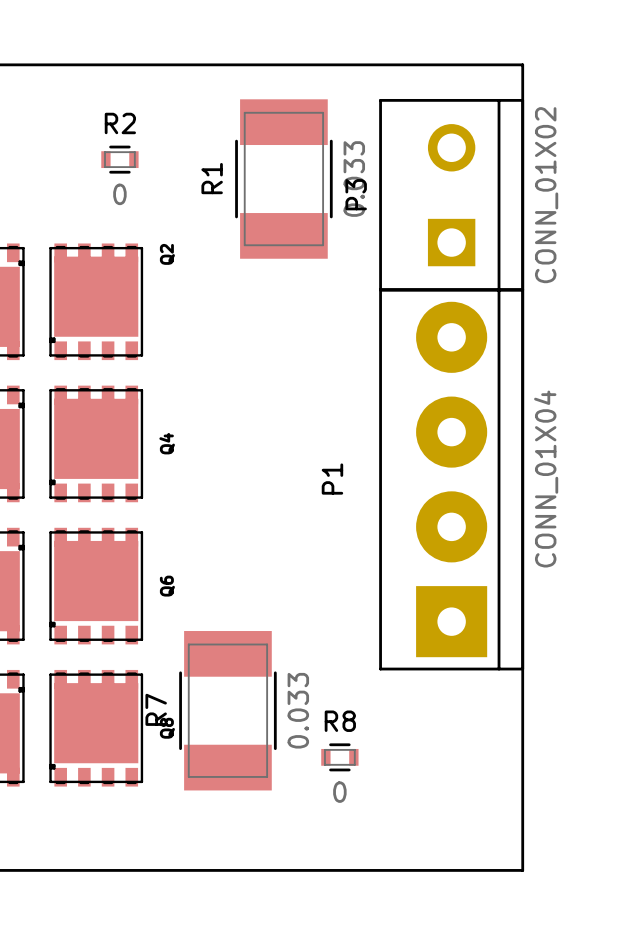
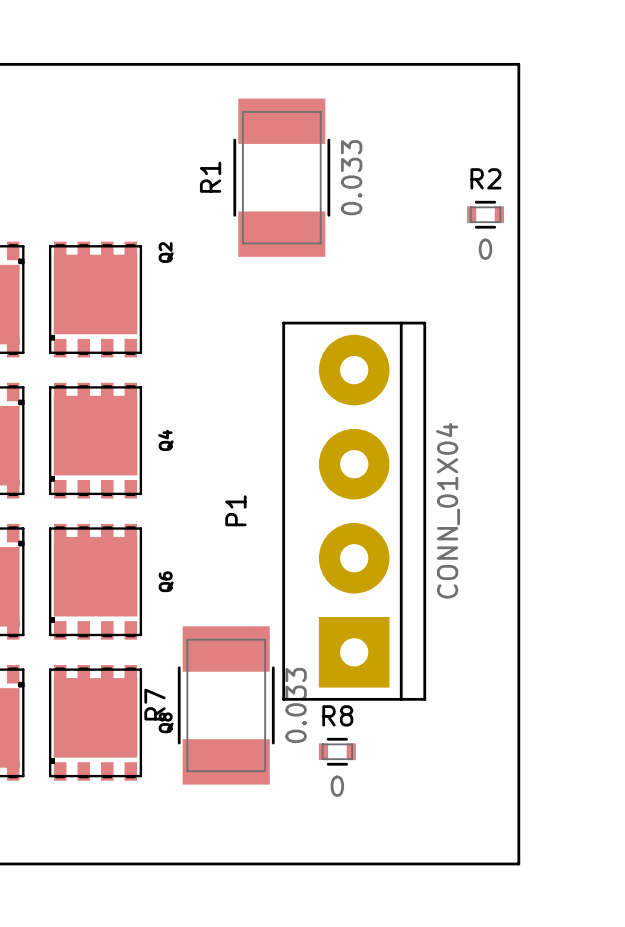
R2 position: (119, 159) -> (485, 214)
P3: CONN_01X02 (451, 195) -> none
P1 position: (451, 479) -> (354, 511)

